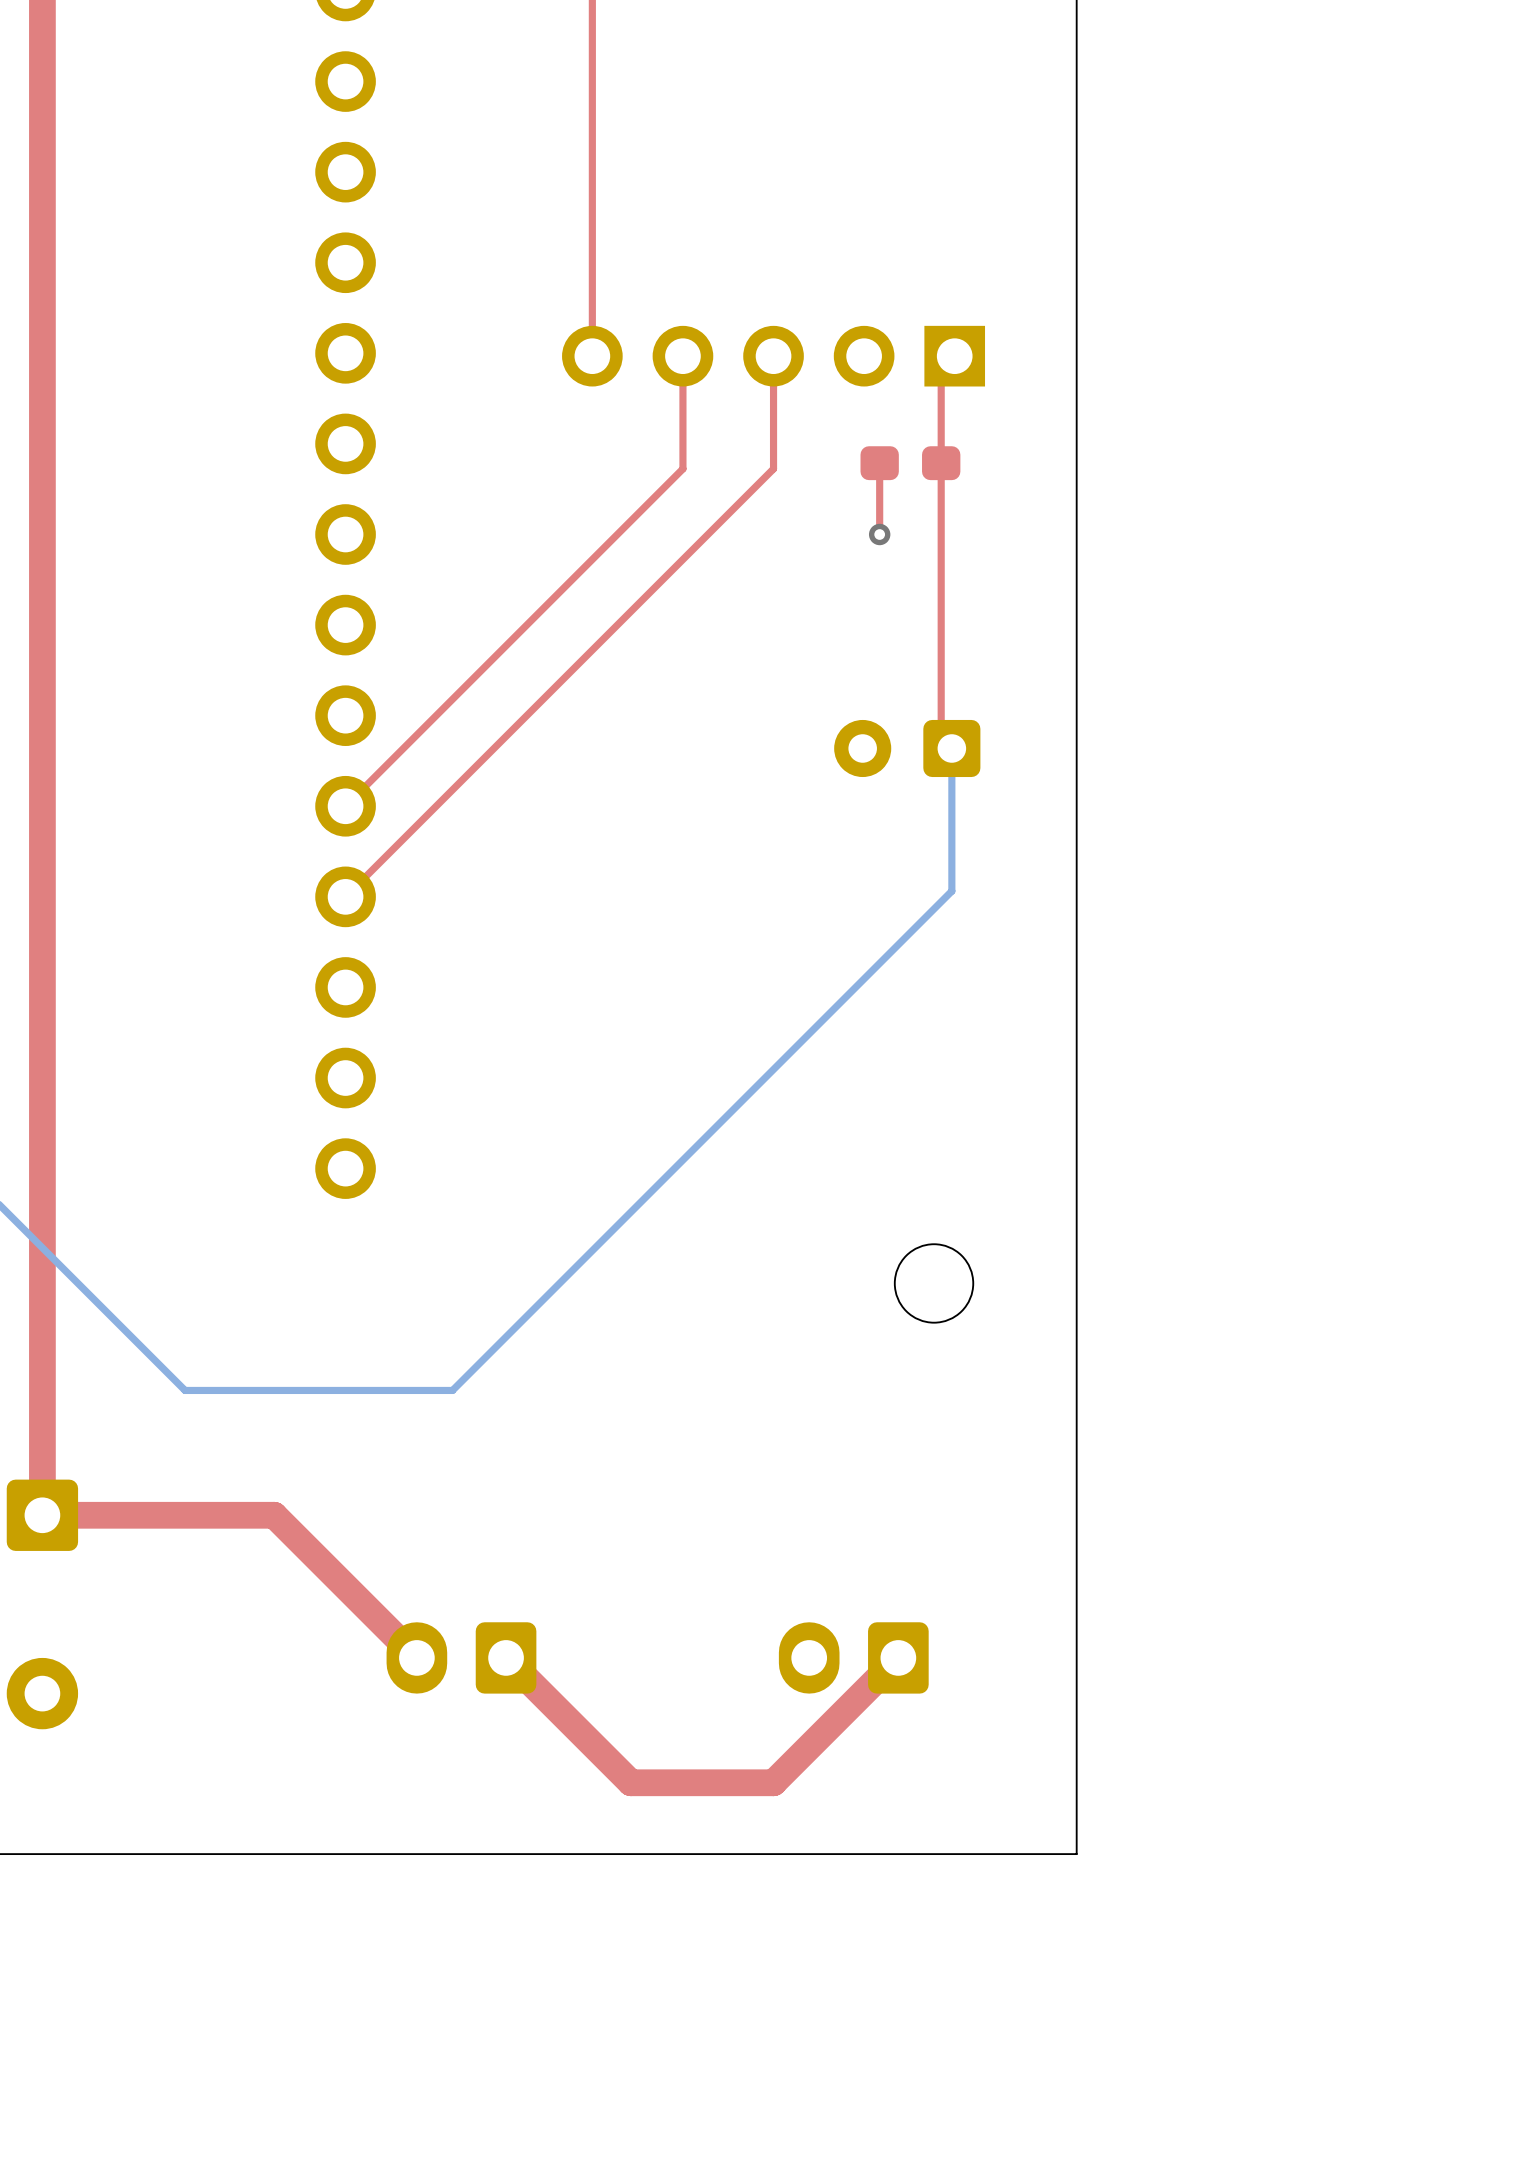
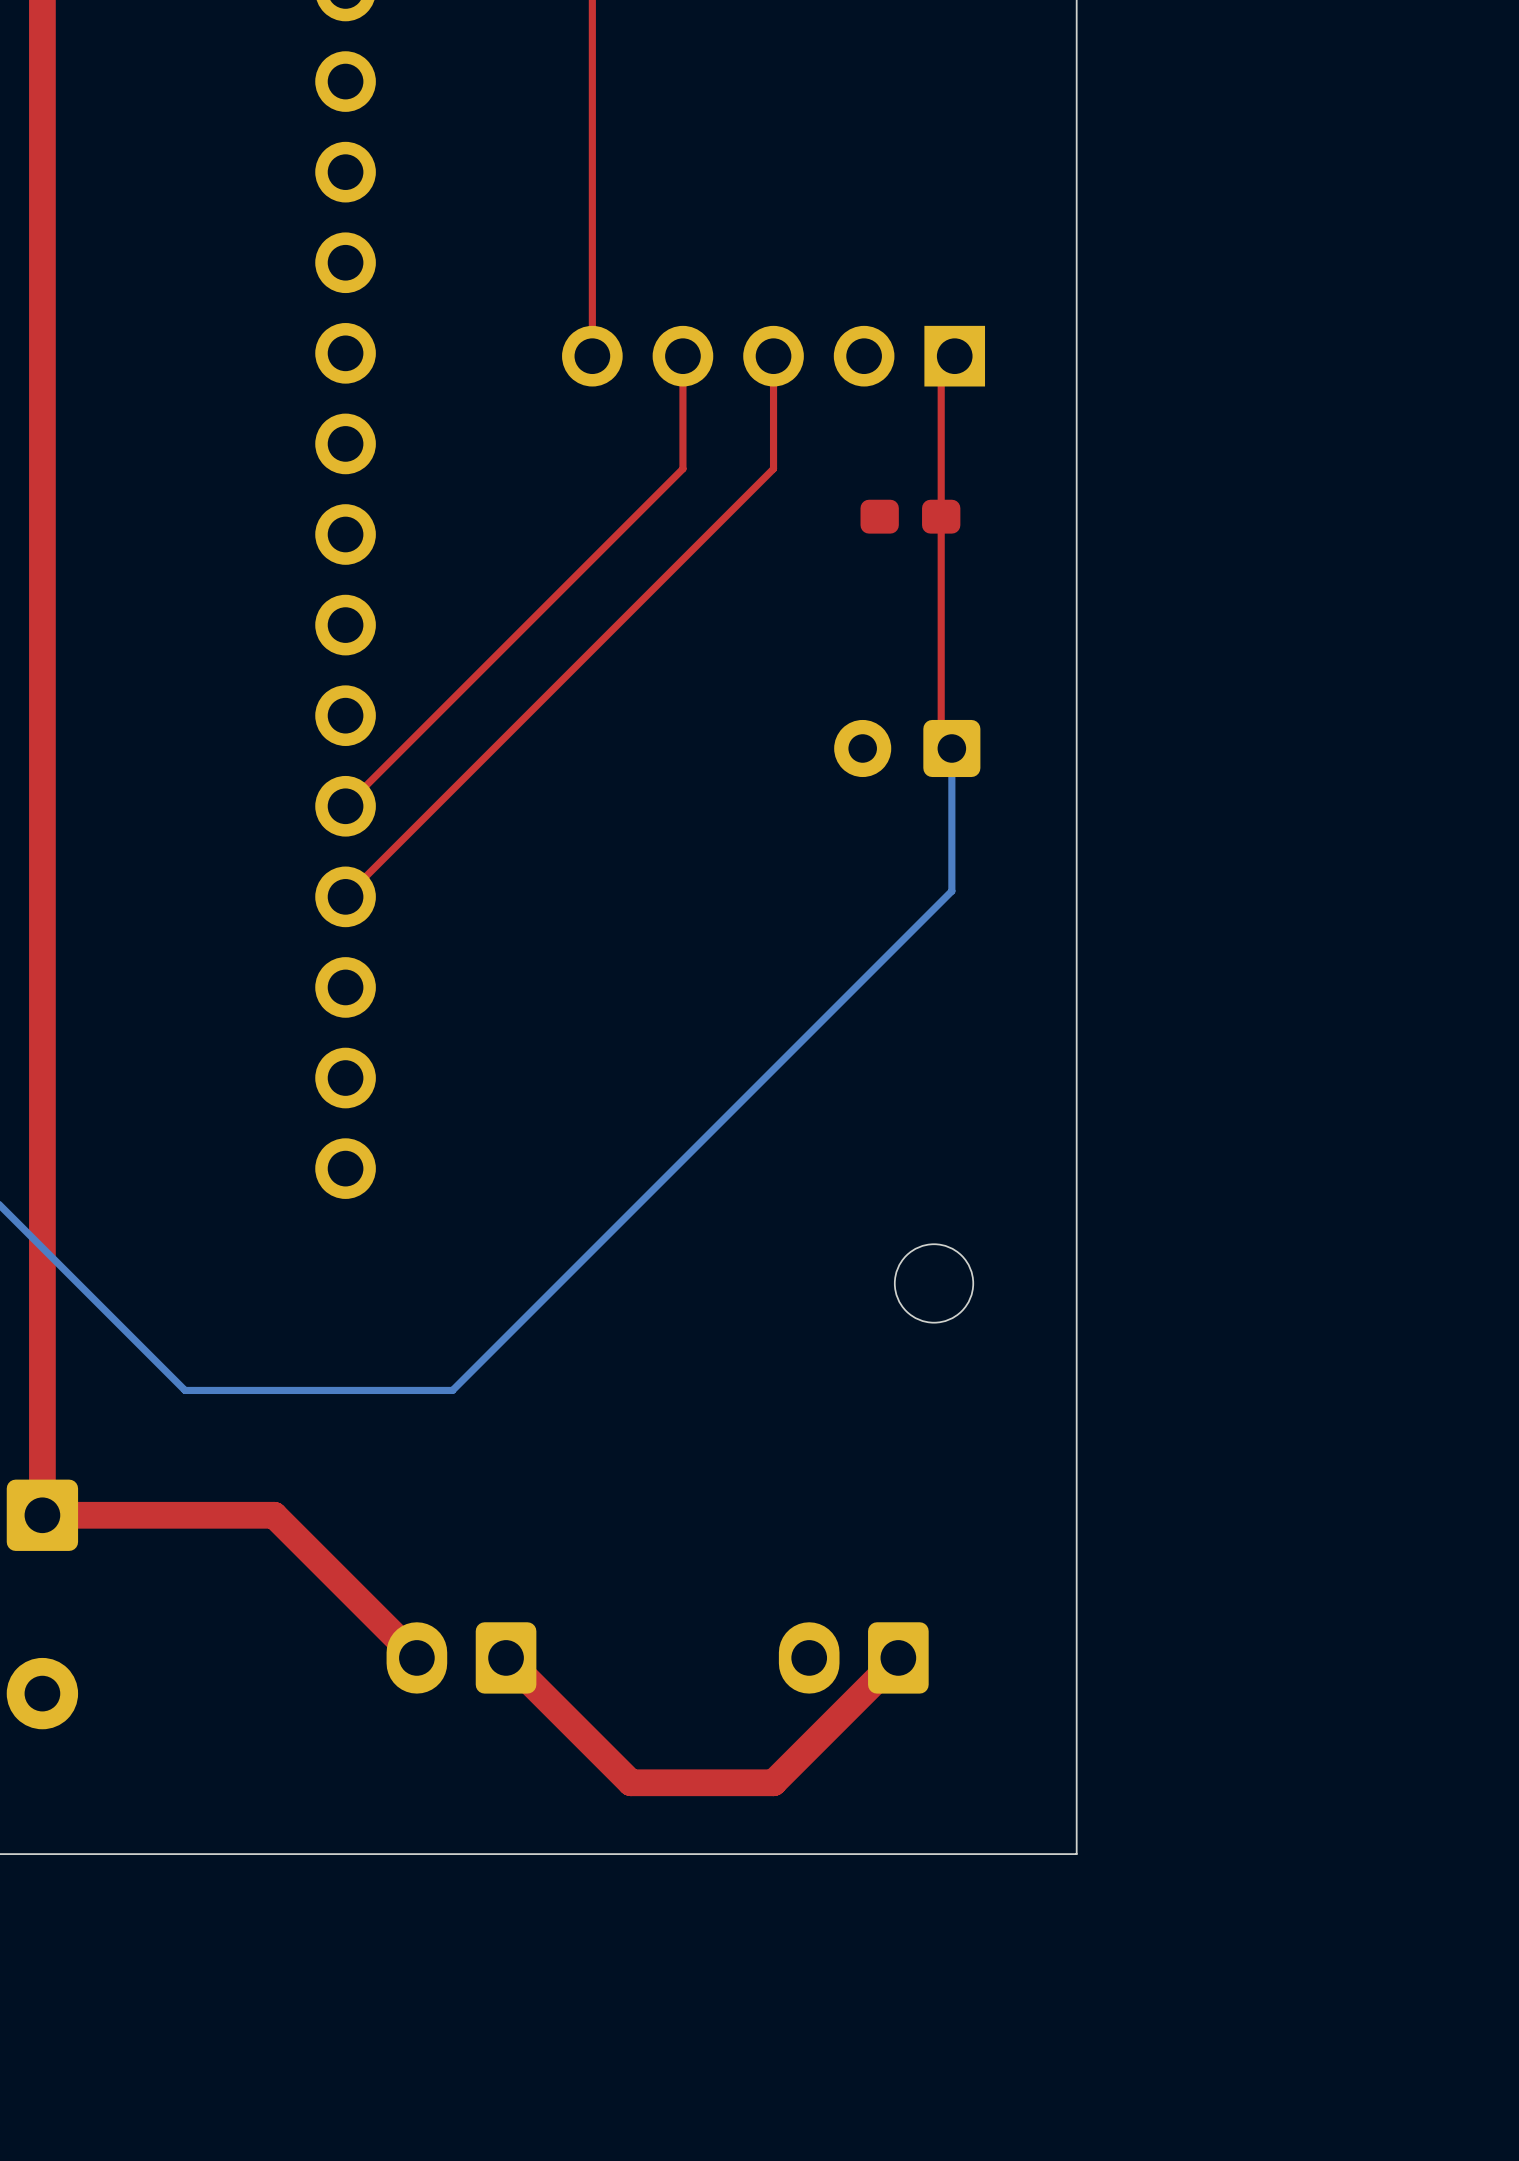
top track: (879, 463) (879, 534) -> none
part position: (910, 463) -> (910, 516)
via: (879, 534) -> none

